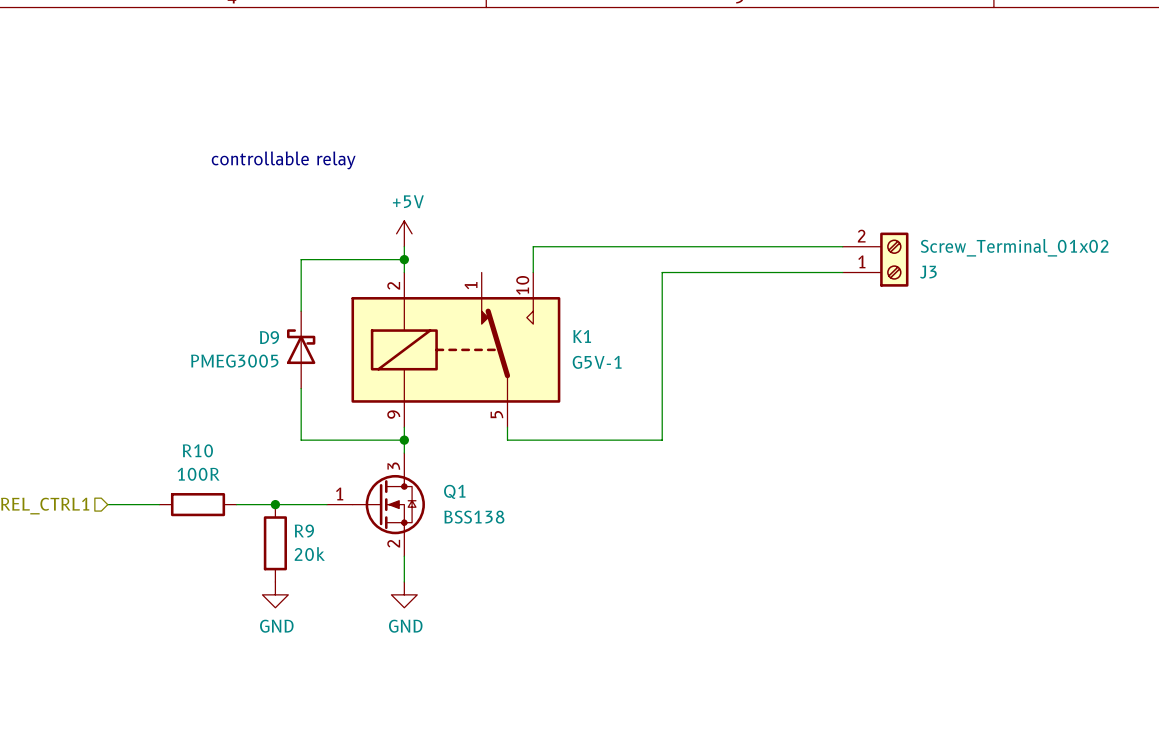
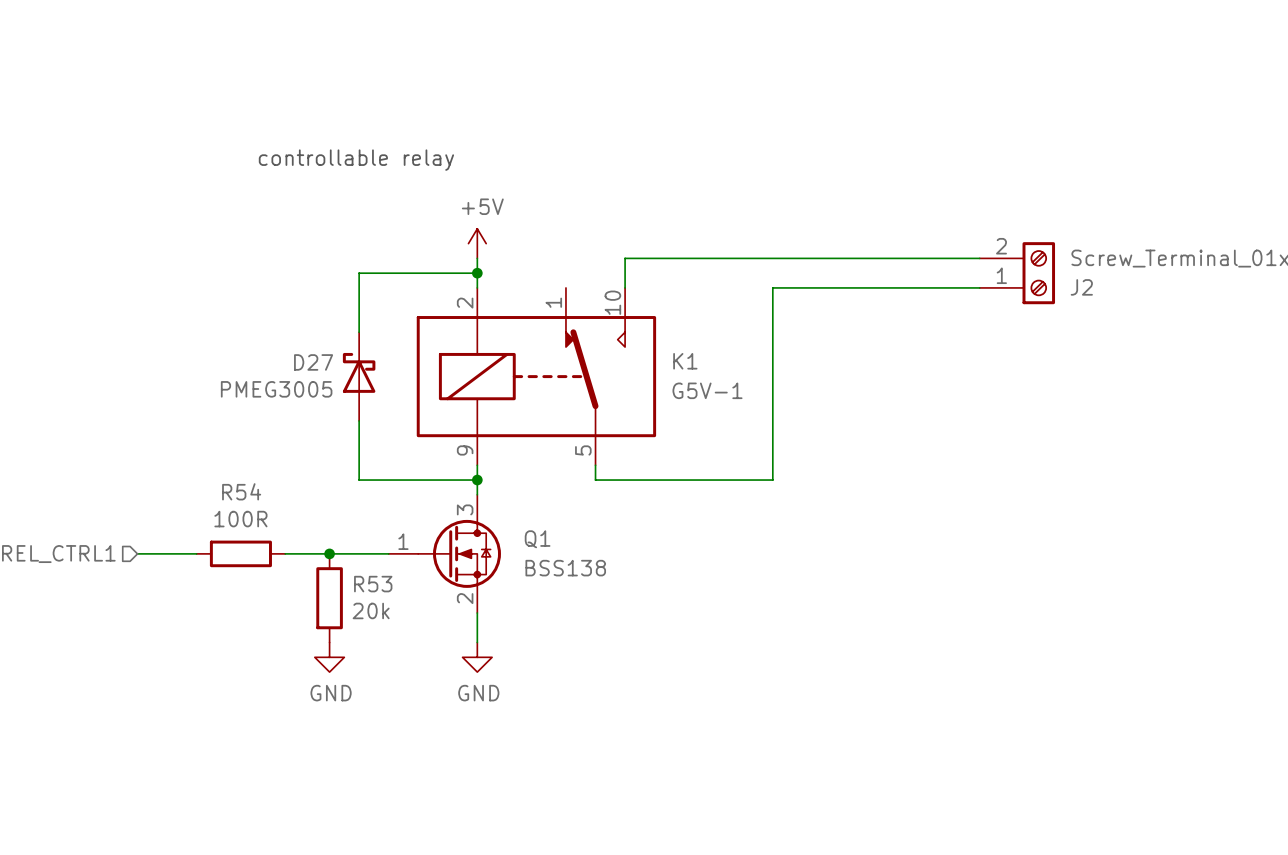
J3 name: J3 (928, 272) -> J2 (1081, 287)
D9 name: D9 (269, 337) -> D27 (313, 362)
R10 name: R10 (197, 450) -> R54 (241, 491)
R9 name: R9 (304, 531) -> R53 (373, 584)

